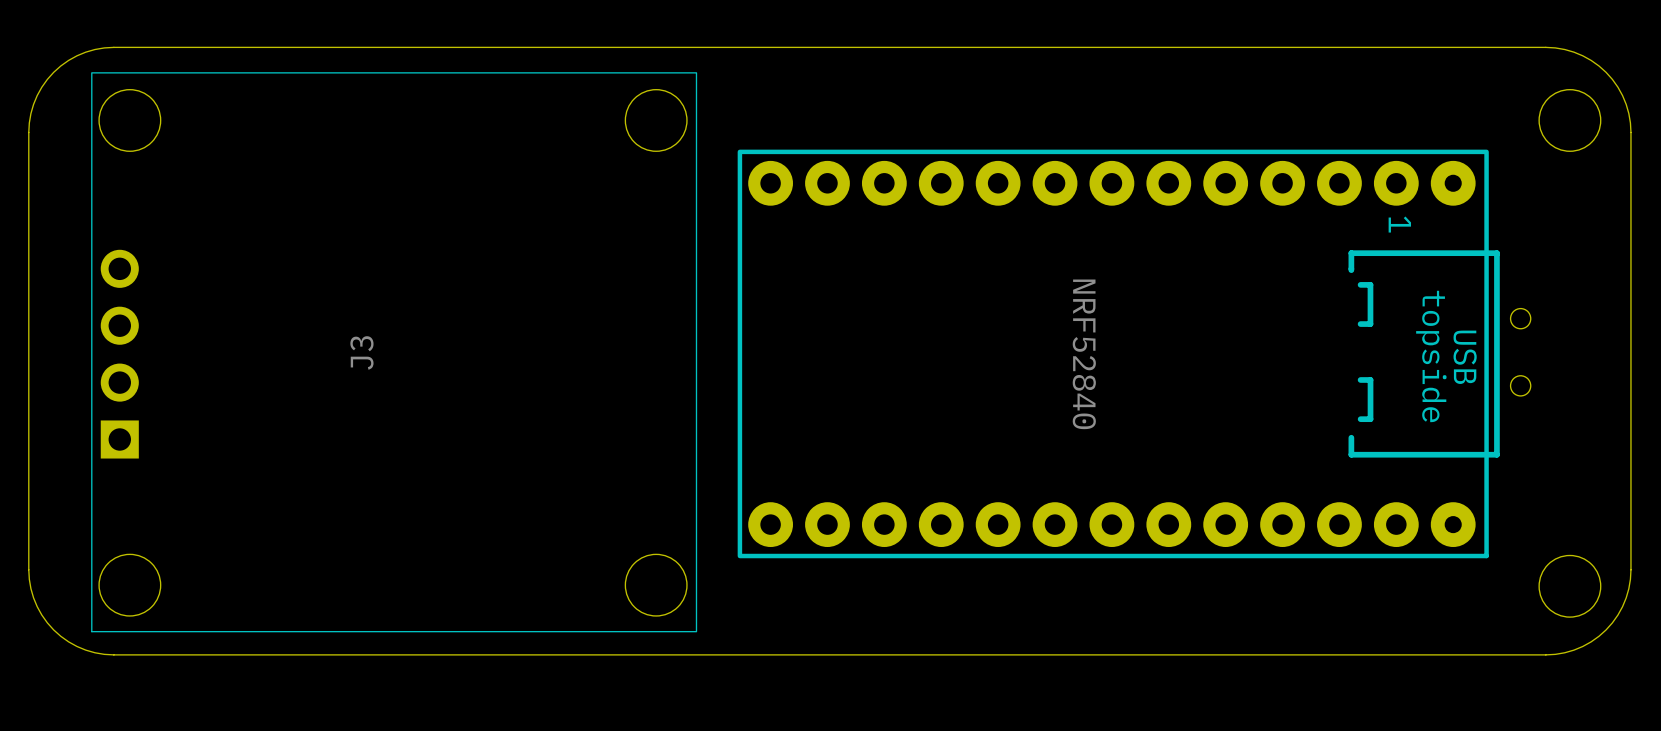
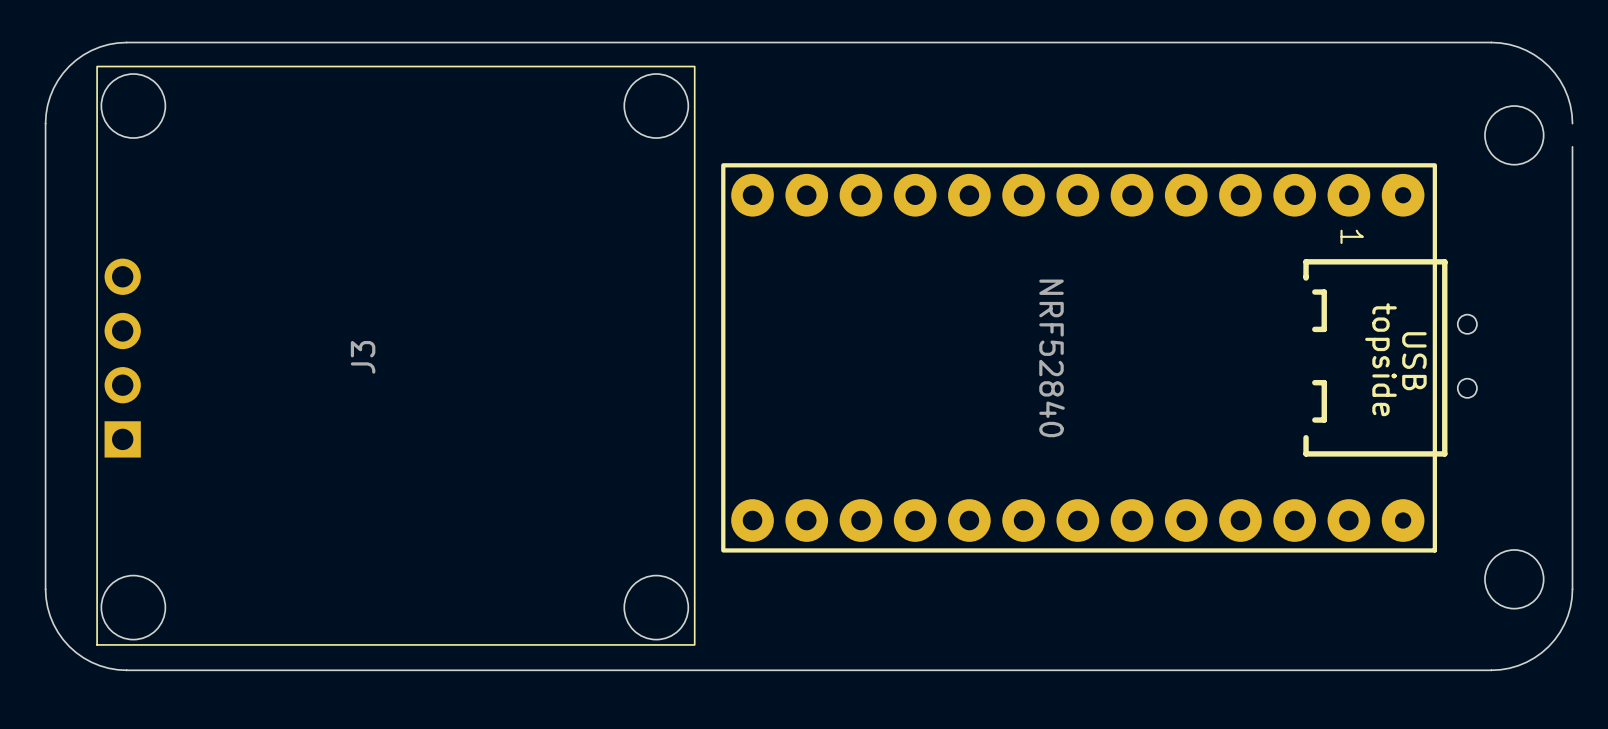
J3 footprint: [91, 72, 698, 633] -> [96, 65, 696, 646]
board edge: (28, 132) (30, 113) (37, 95) (53, 72) (68, 60) (85, 52) (113, 47) (1545, 47) (1573, 52) (1591, 60) (1606, 72) (1617, 87) (1626, 104) (1630, 132) -> (45, 146) (47, 105) (53, 88) (63, 73) (76, 60) (91, 50) (108, 44) (126, 42) (1491, 42) (1518, 47) (1534, 54) (1548, 66) (1564, 88) (1570, 105) (1572, 123)
board edge: (28, 569) (33, 597) (41, 615) (53, 629) (68, 641) (85, 650) (113, 654) (1545, 654) (1573, 650) (1591, 641) (1606, 629) (1622, 606) (1628, 588) (1630, 569) -> (45, 563) (47, 607) (53, 624) (63, 639) (76, 652) (91, 662) (108, 668) (126, 670) (1500, 669) (1518, 665) (1534, 657) (1548, 646) (1560, 632) (1570, 607) (1572, 563)

